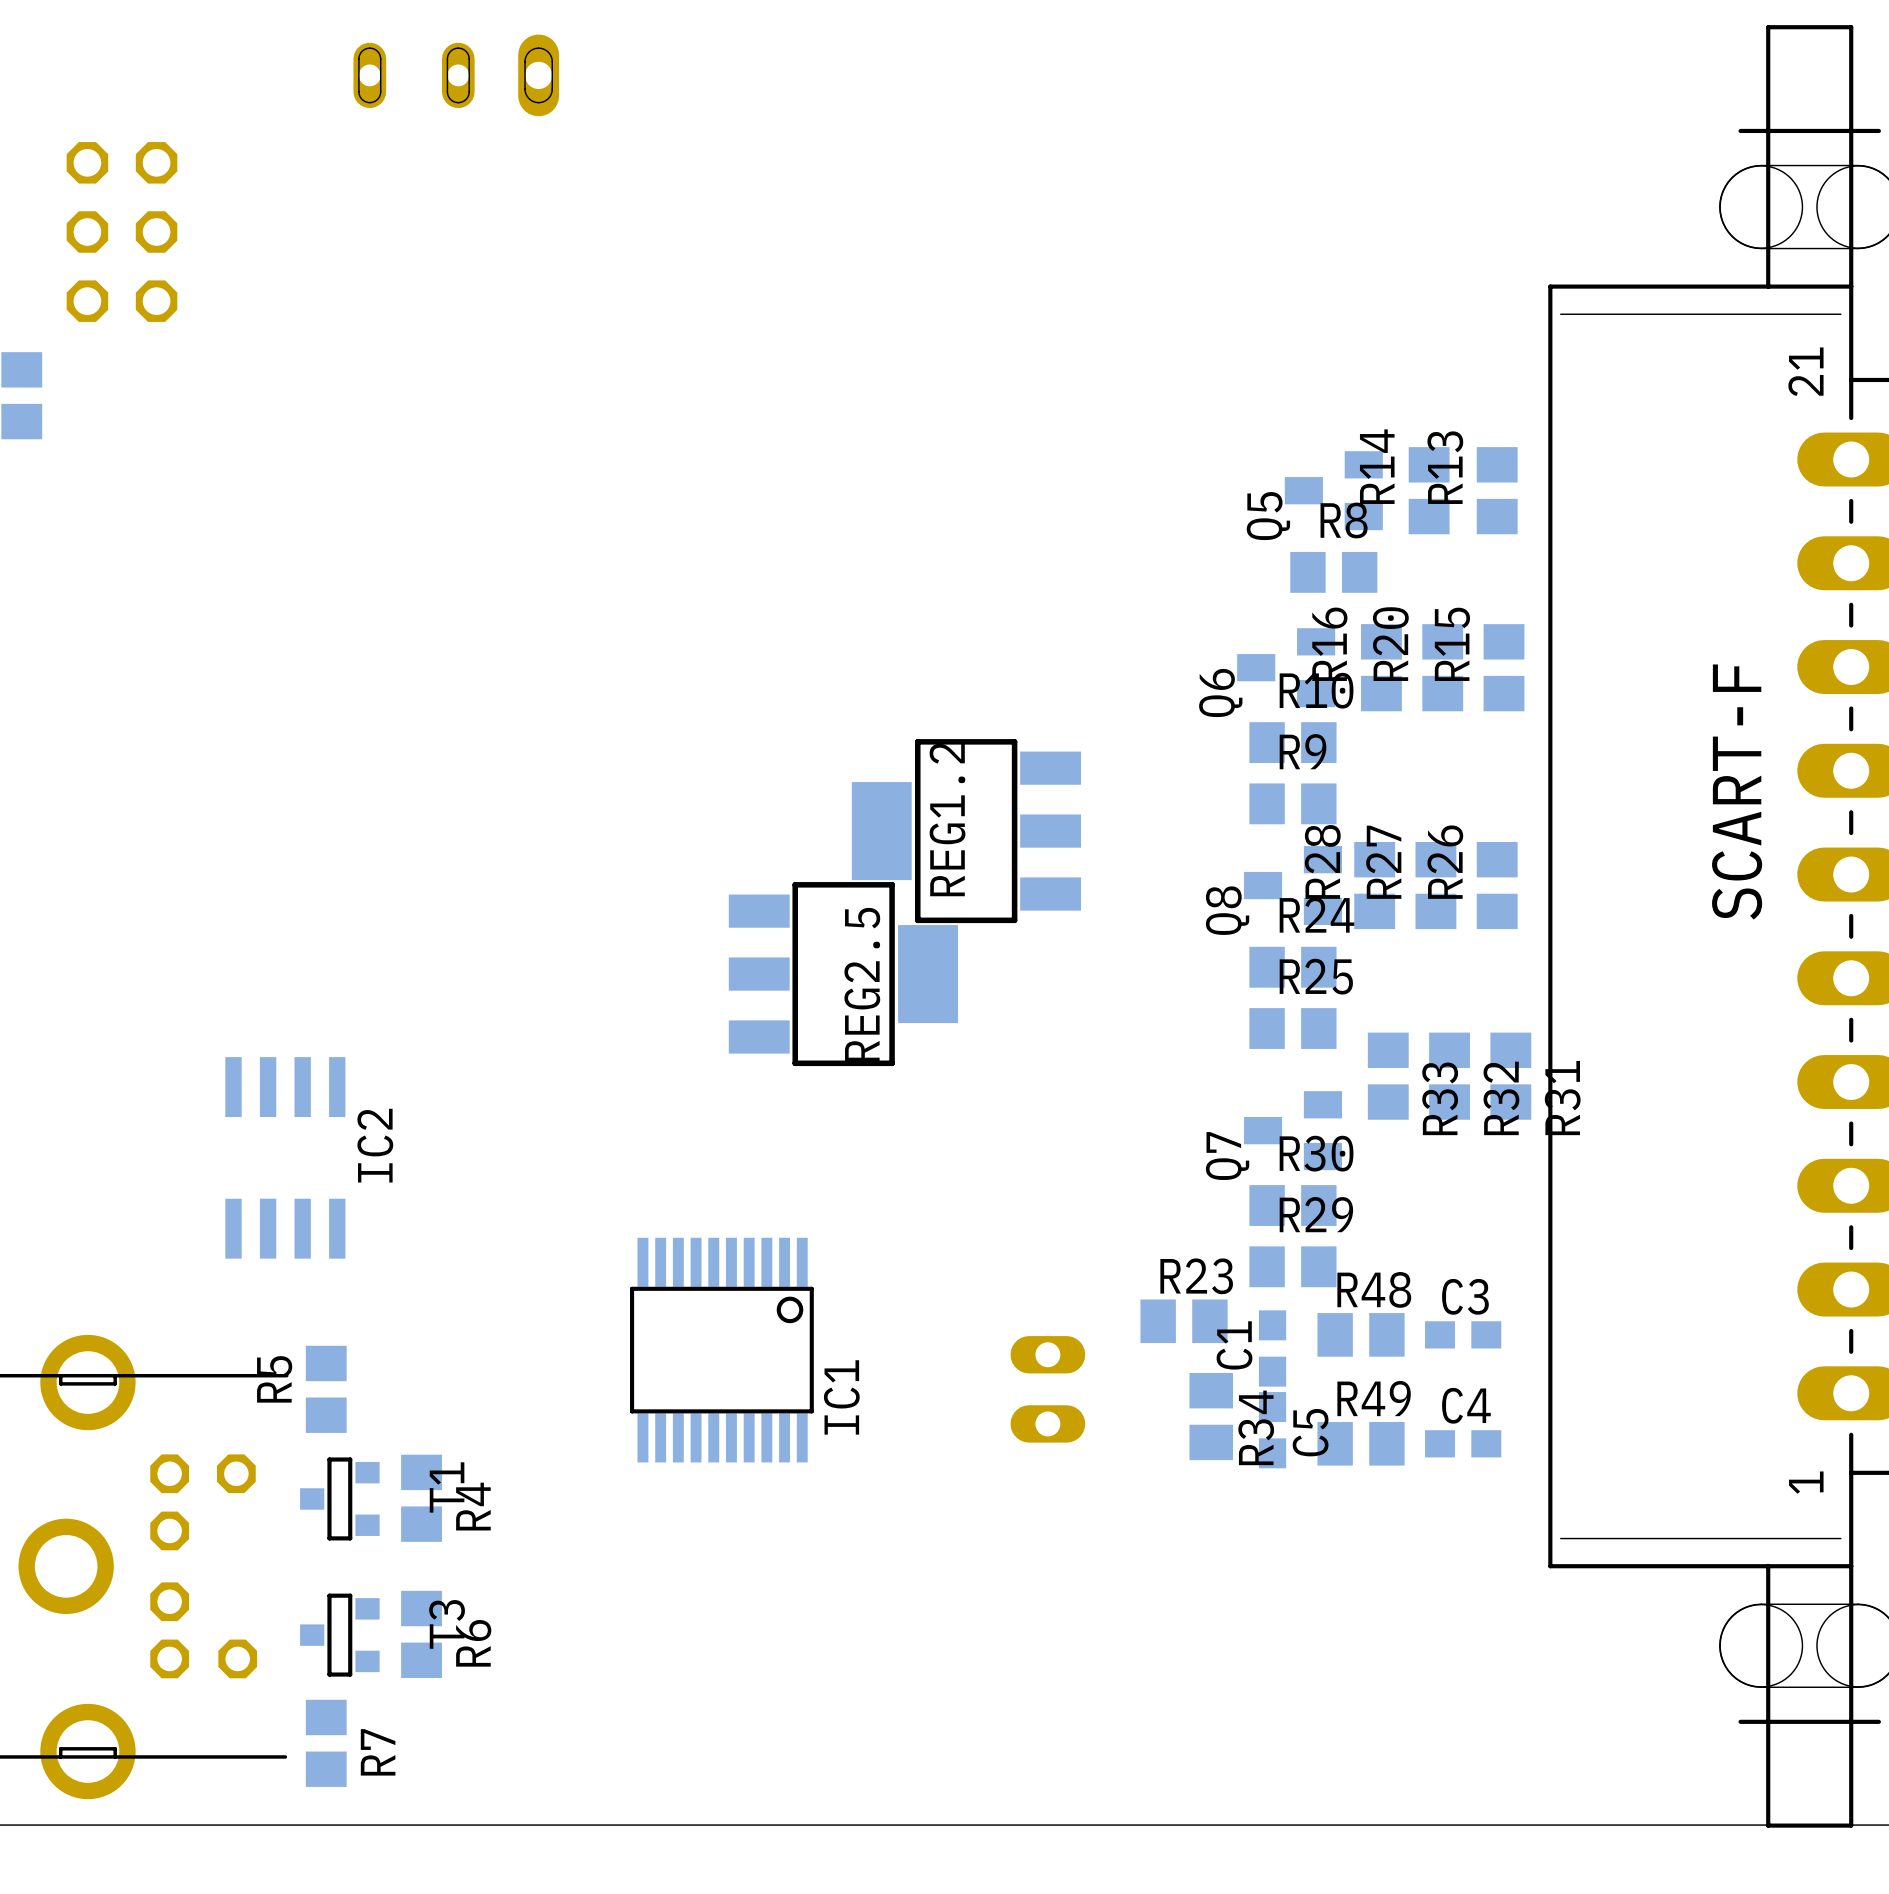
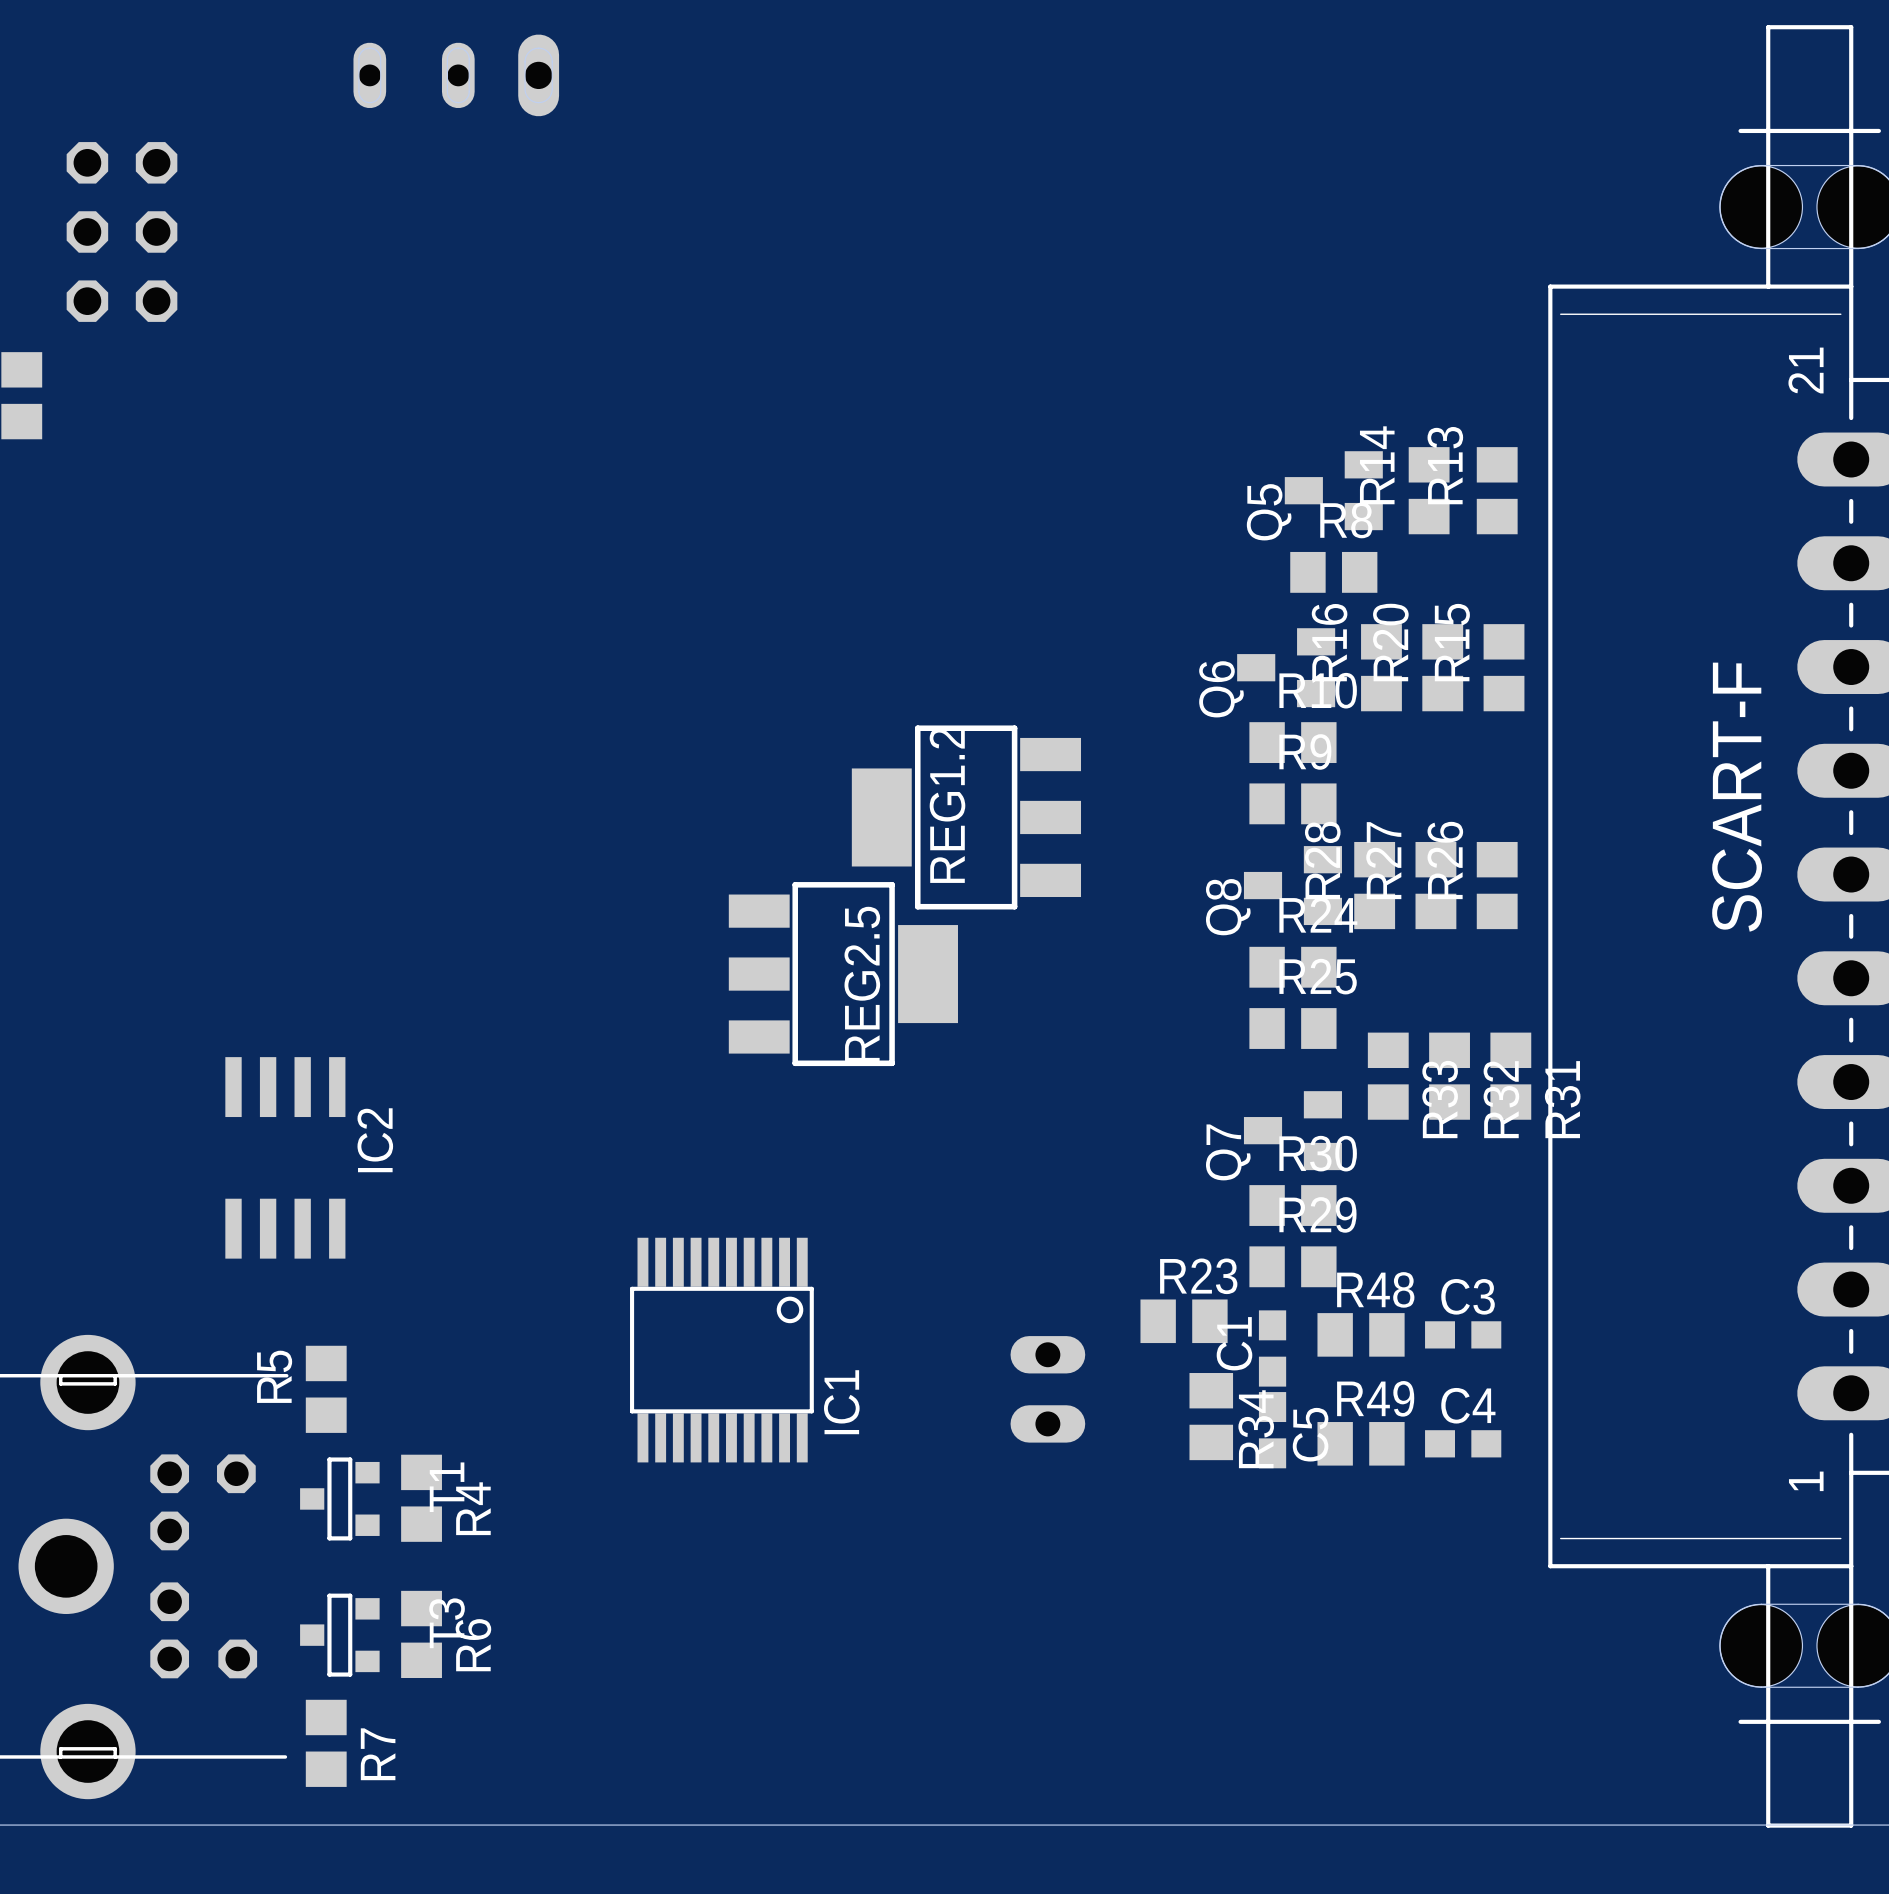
REG1.2 position: (966, 831) -> (966, 817)

